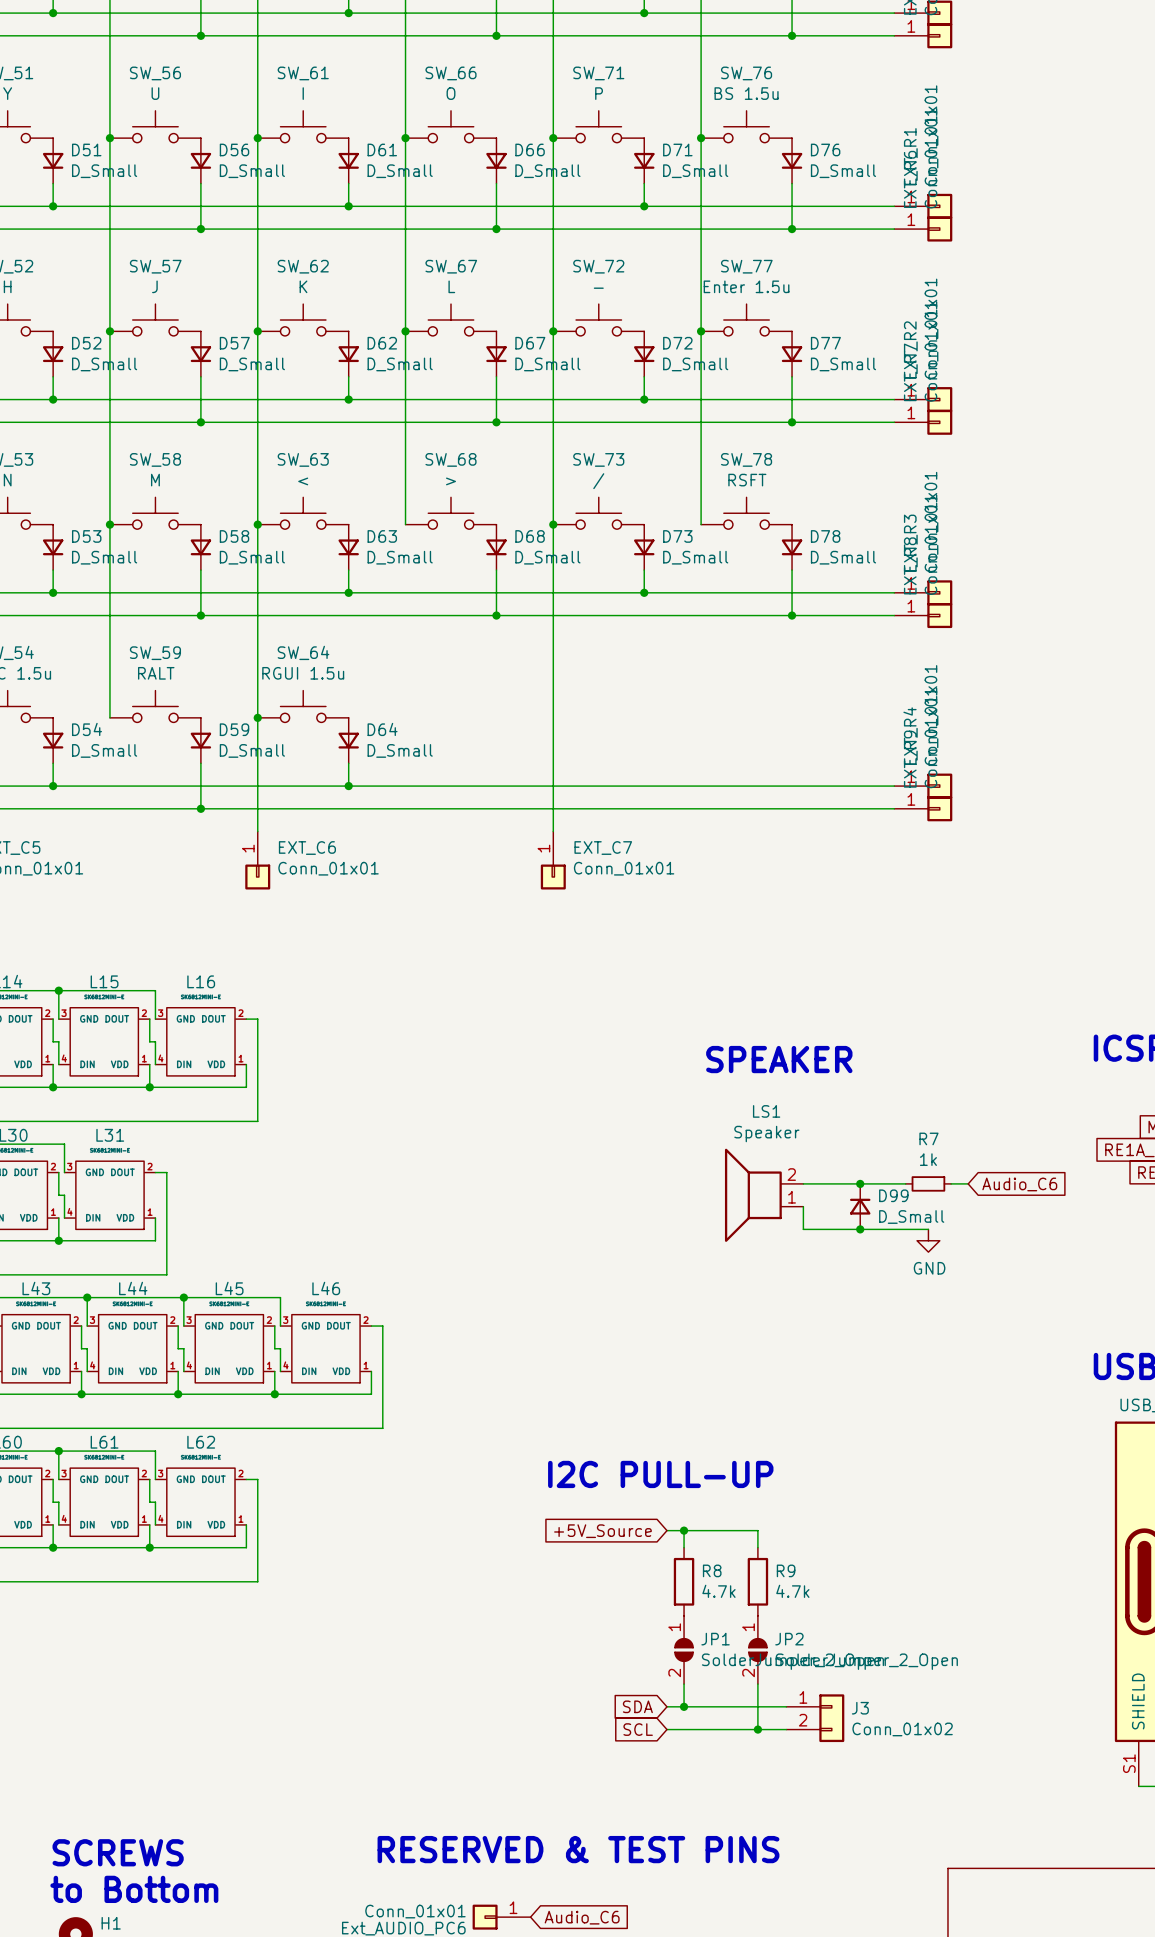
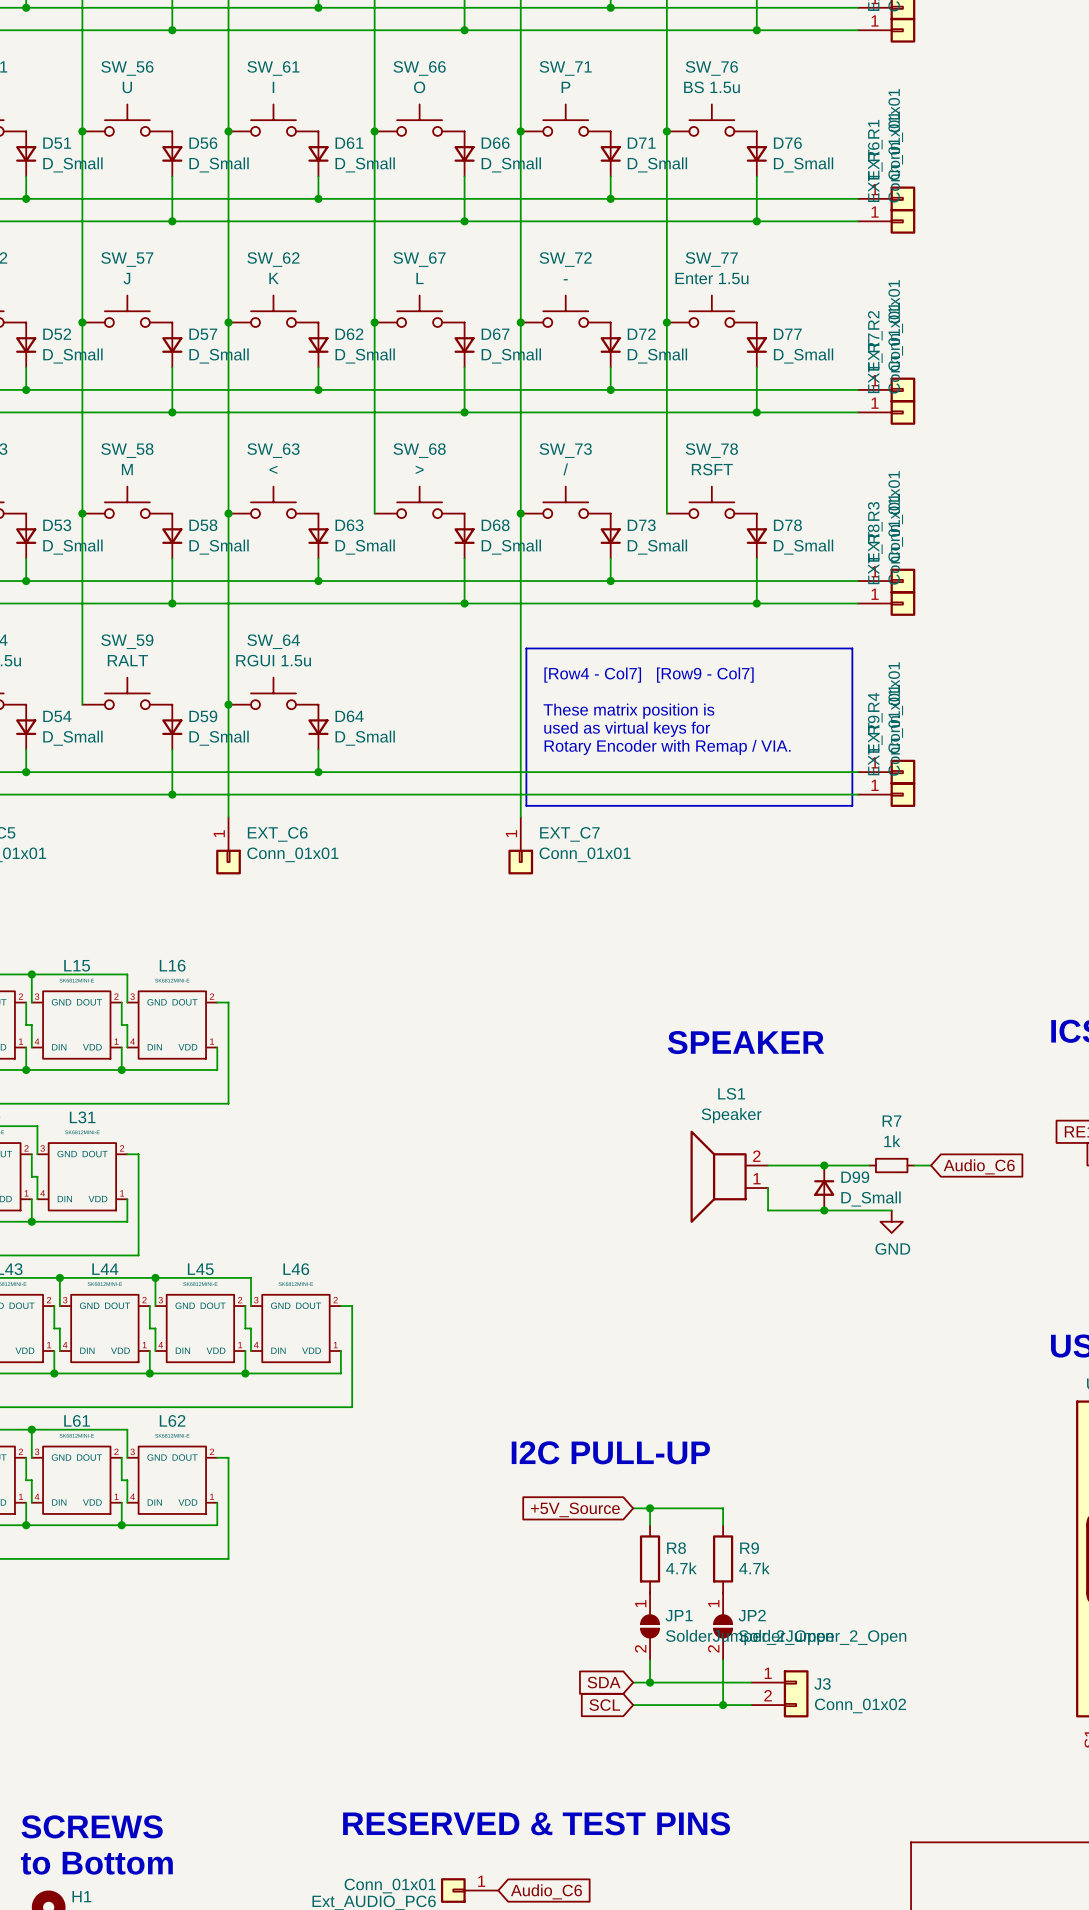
line: none -> (526, 648) (526, 805) (852, 805) (852, 648) (526, 648)
text: none -> [Row4 - Col7] [Row9 - Col7] (649, 675)
text: none -> These matrix position is (628, 711)
text: none -> used as virtual keys for (627, 729)
text: none -> Rotary Encoder with Remap / VIA. (667, 747)

